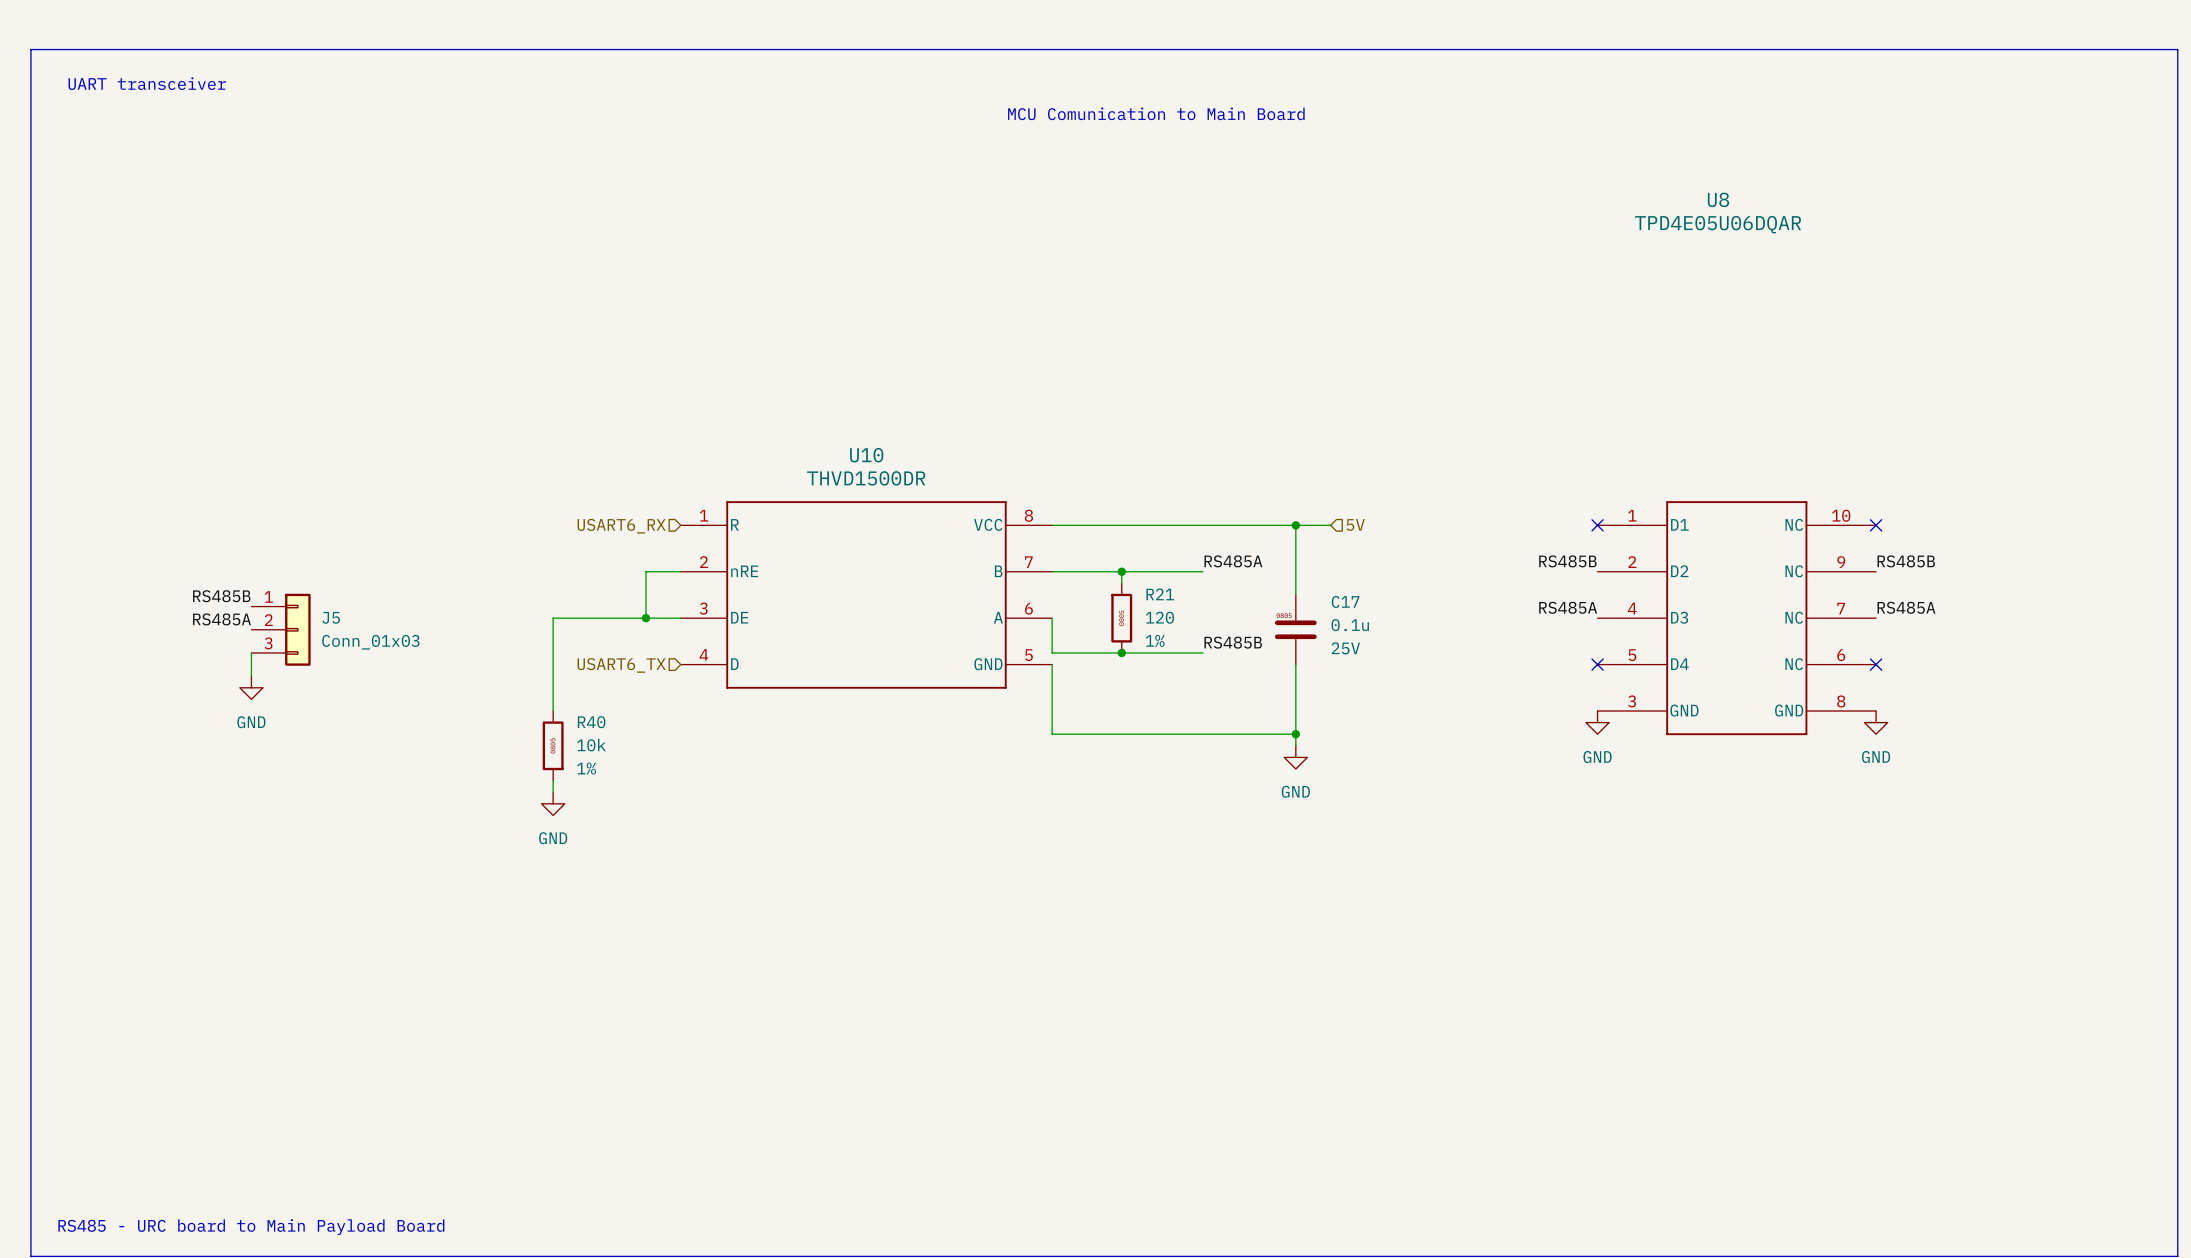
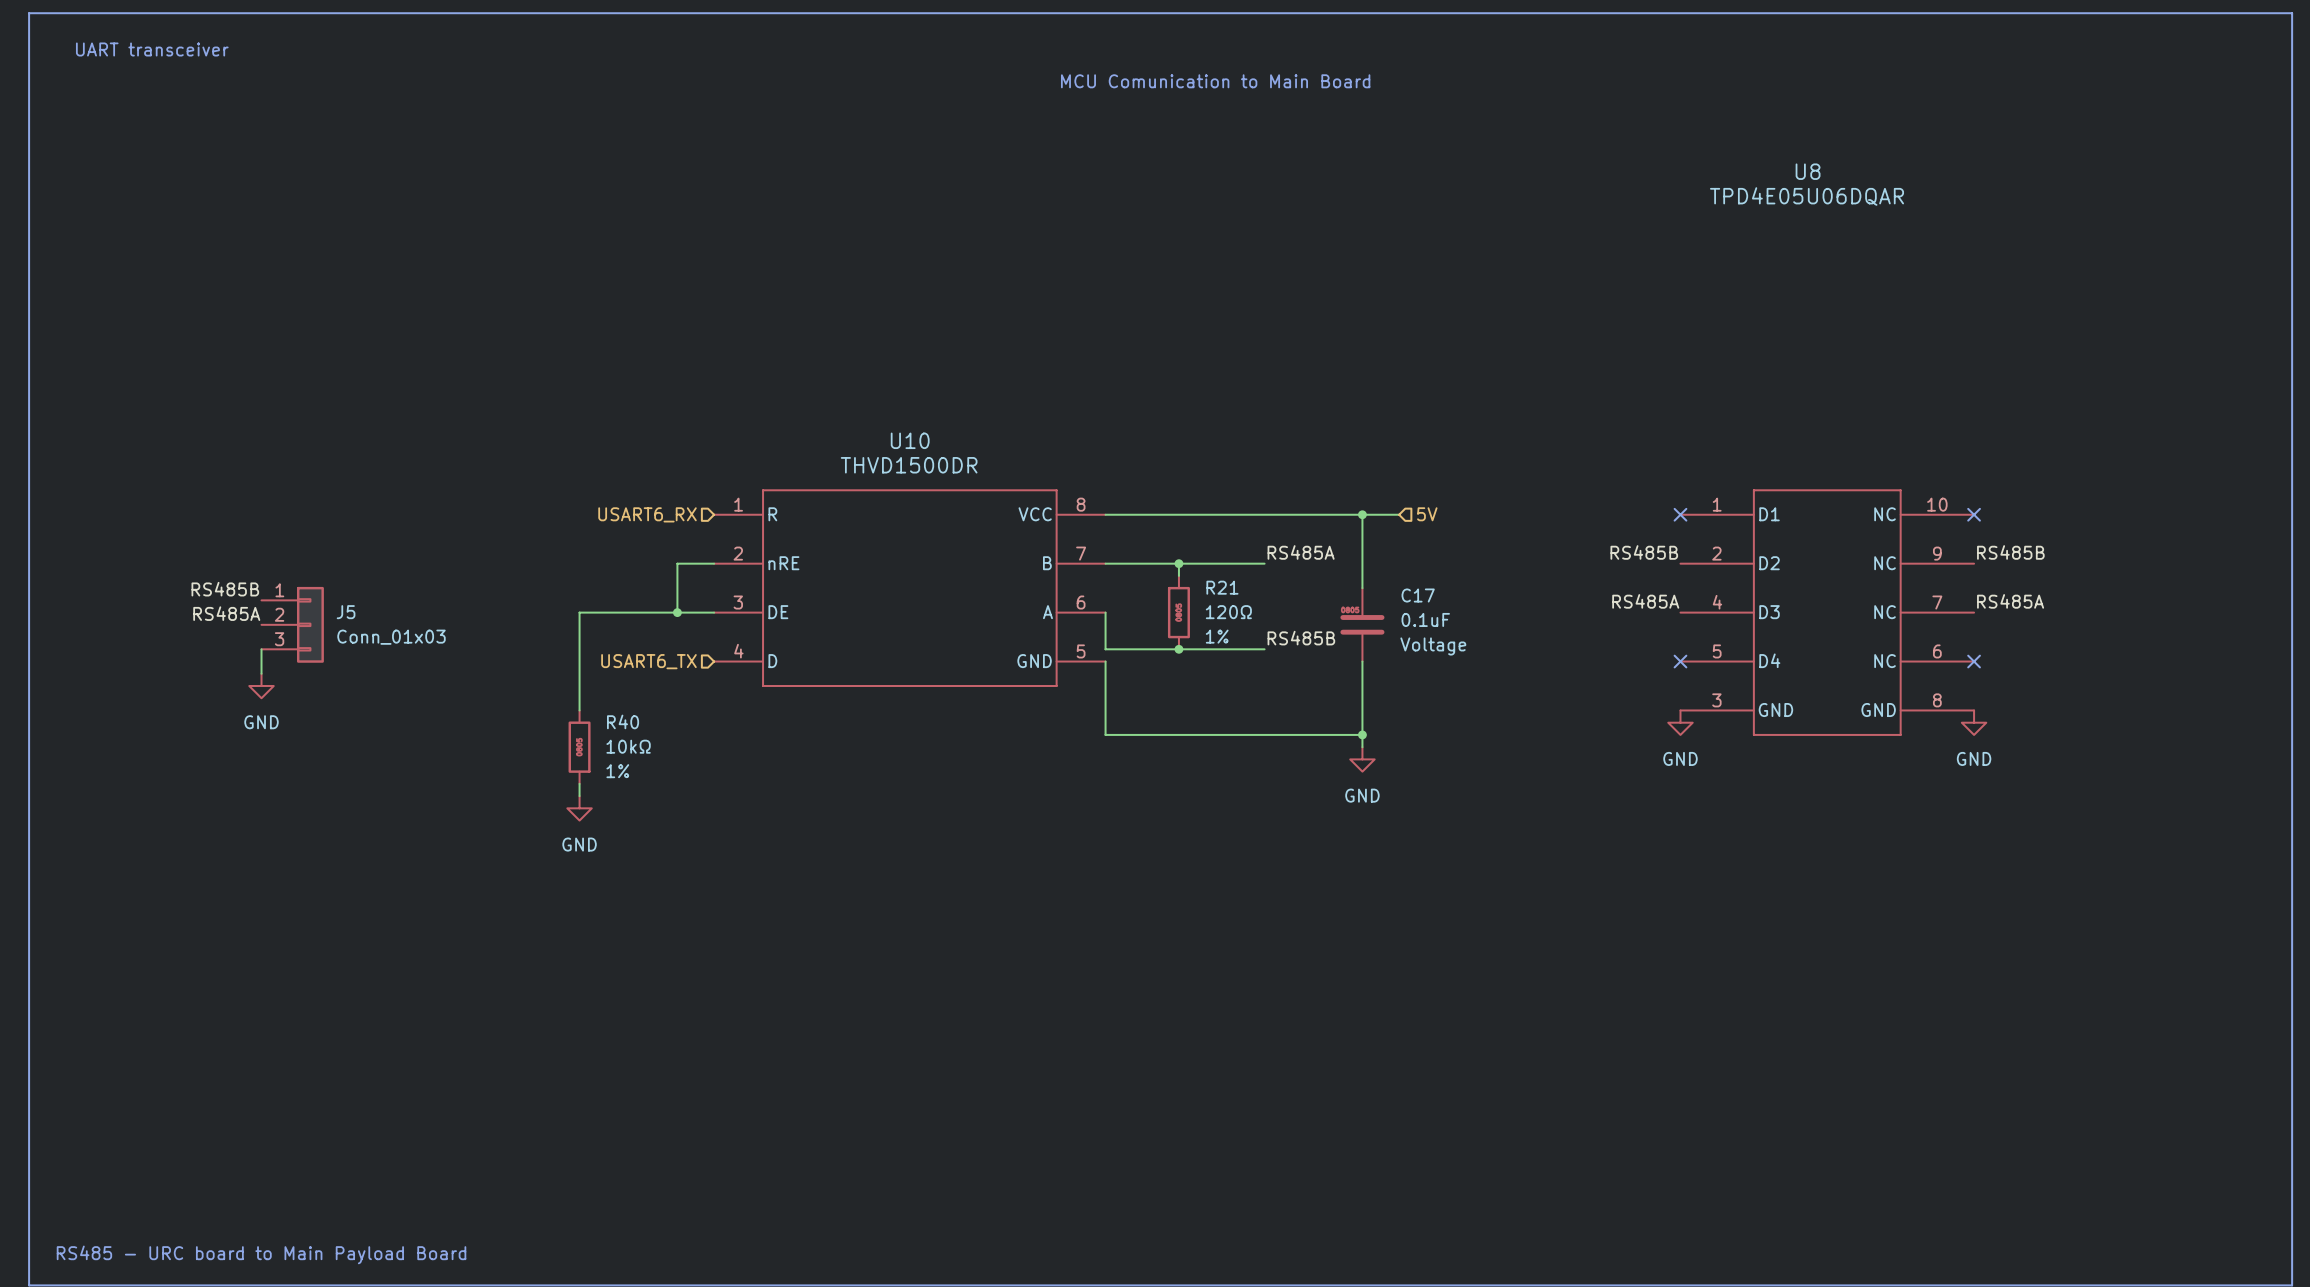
R21 value: 120 (1159, 617) -> 120Ω (1228, 612)
C17 value: 0.1u (1350, 625) -> 0.1uF (1425, 619)
C17 text: 25V (1345, 648) -> Voltage (1433, 646)
R40 value: 10k (591, 745) -> 10kΩ (628, 746)

